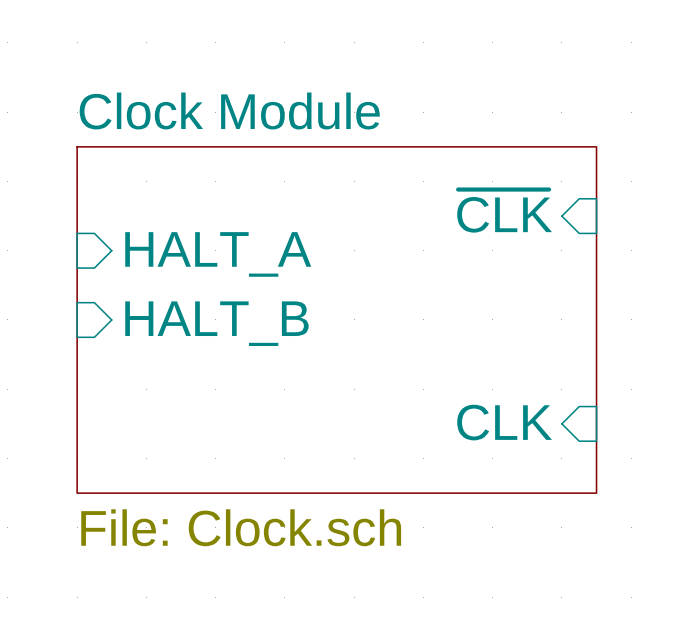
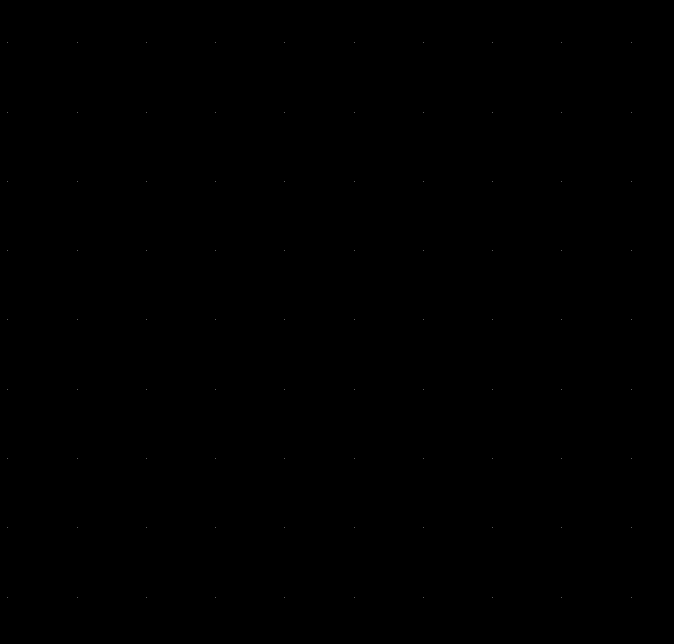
sheet pin: ~{CLK} (504, 211) -> none
sheet pin: HALT_A (218, 254) -> none
sheet Clock Module: File: Clock.sch (336, 319) -> none
sheet pin: HALT_B (216, 323) -> none
sheet pin: CLK (504, 422) -> none

